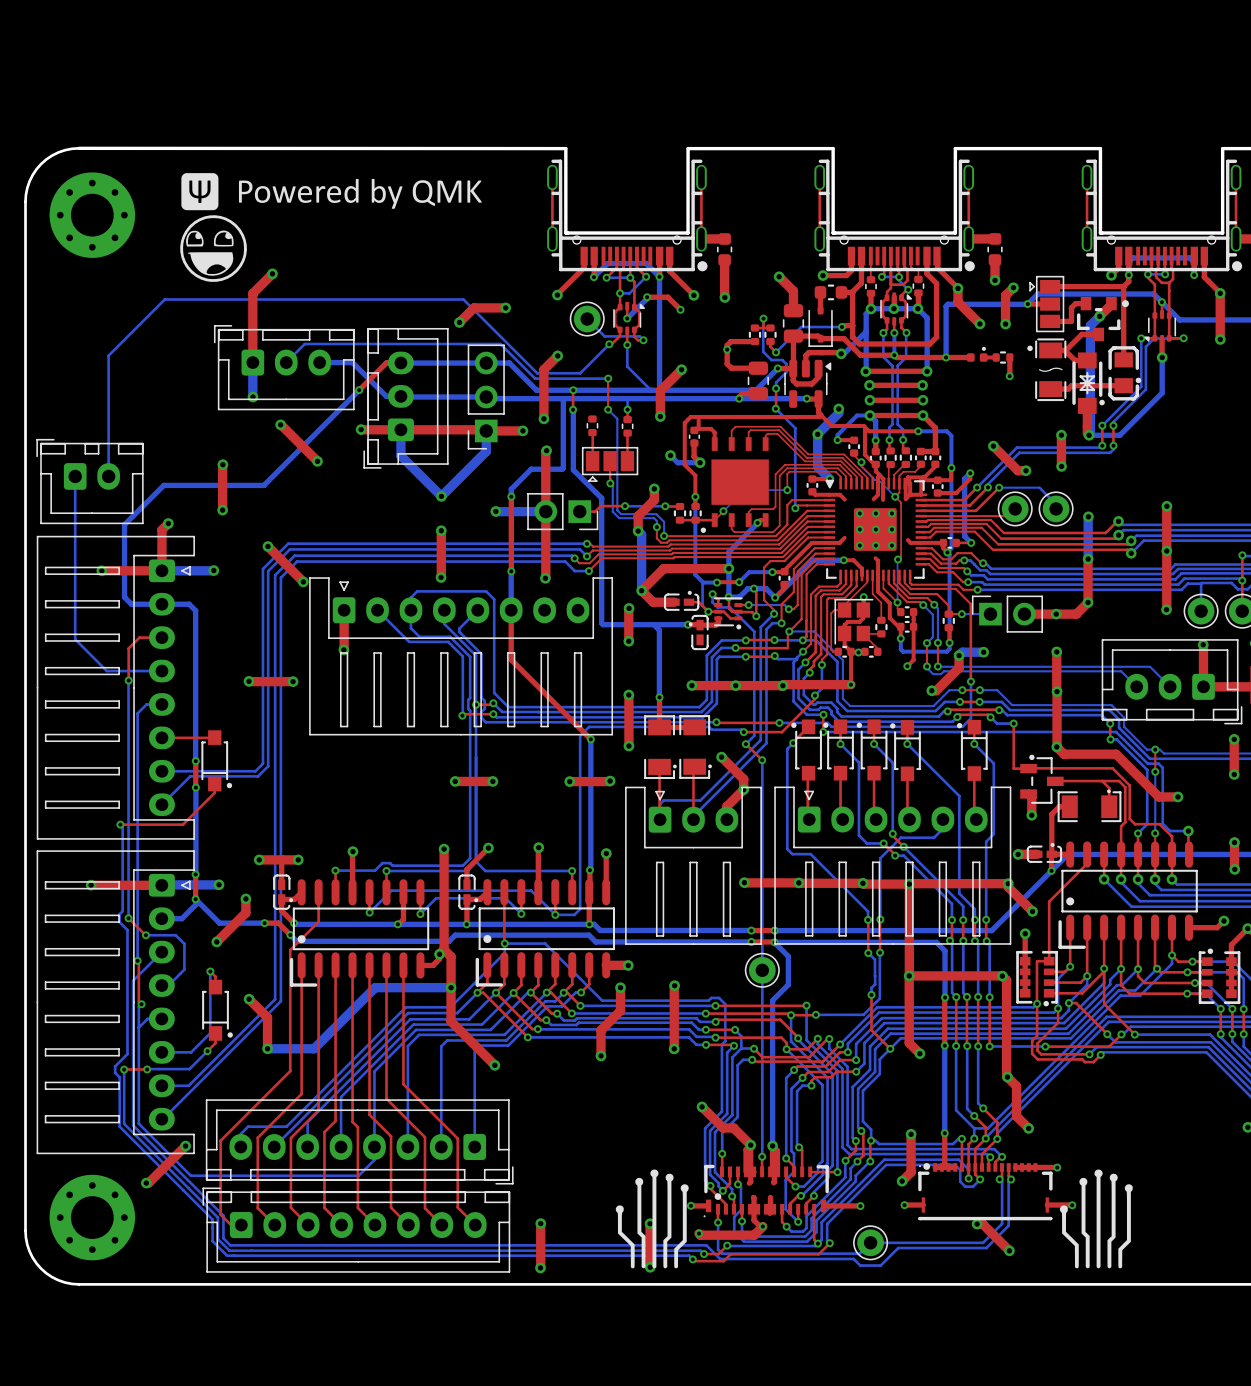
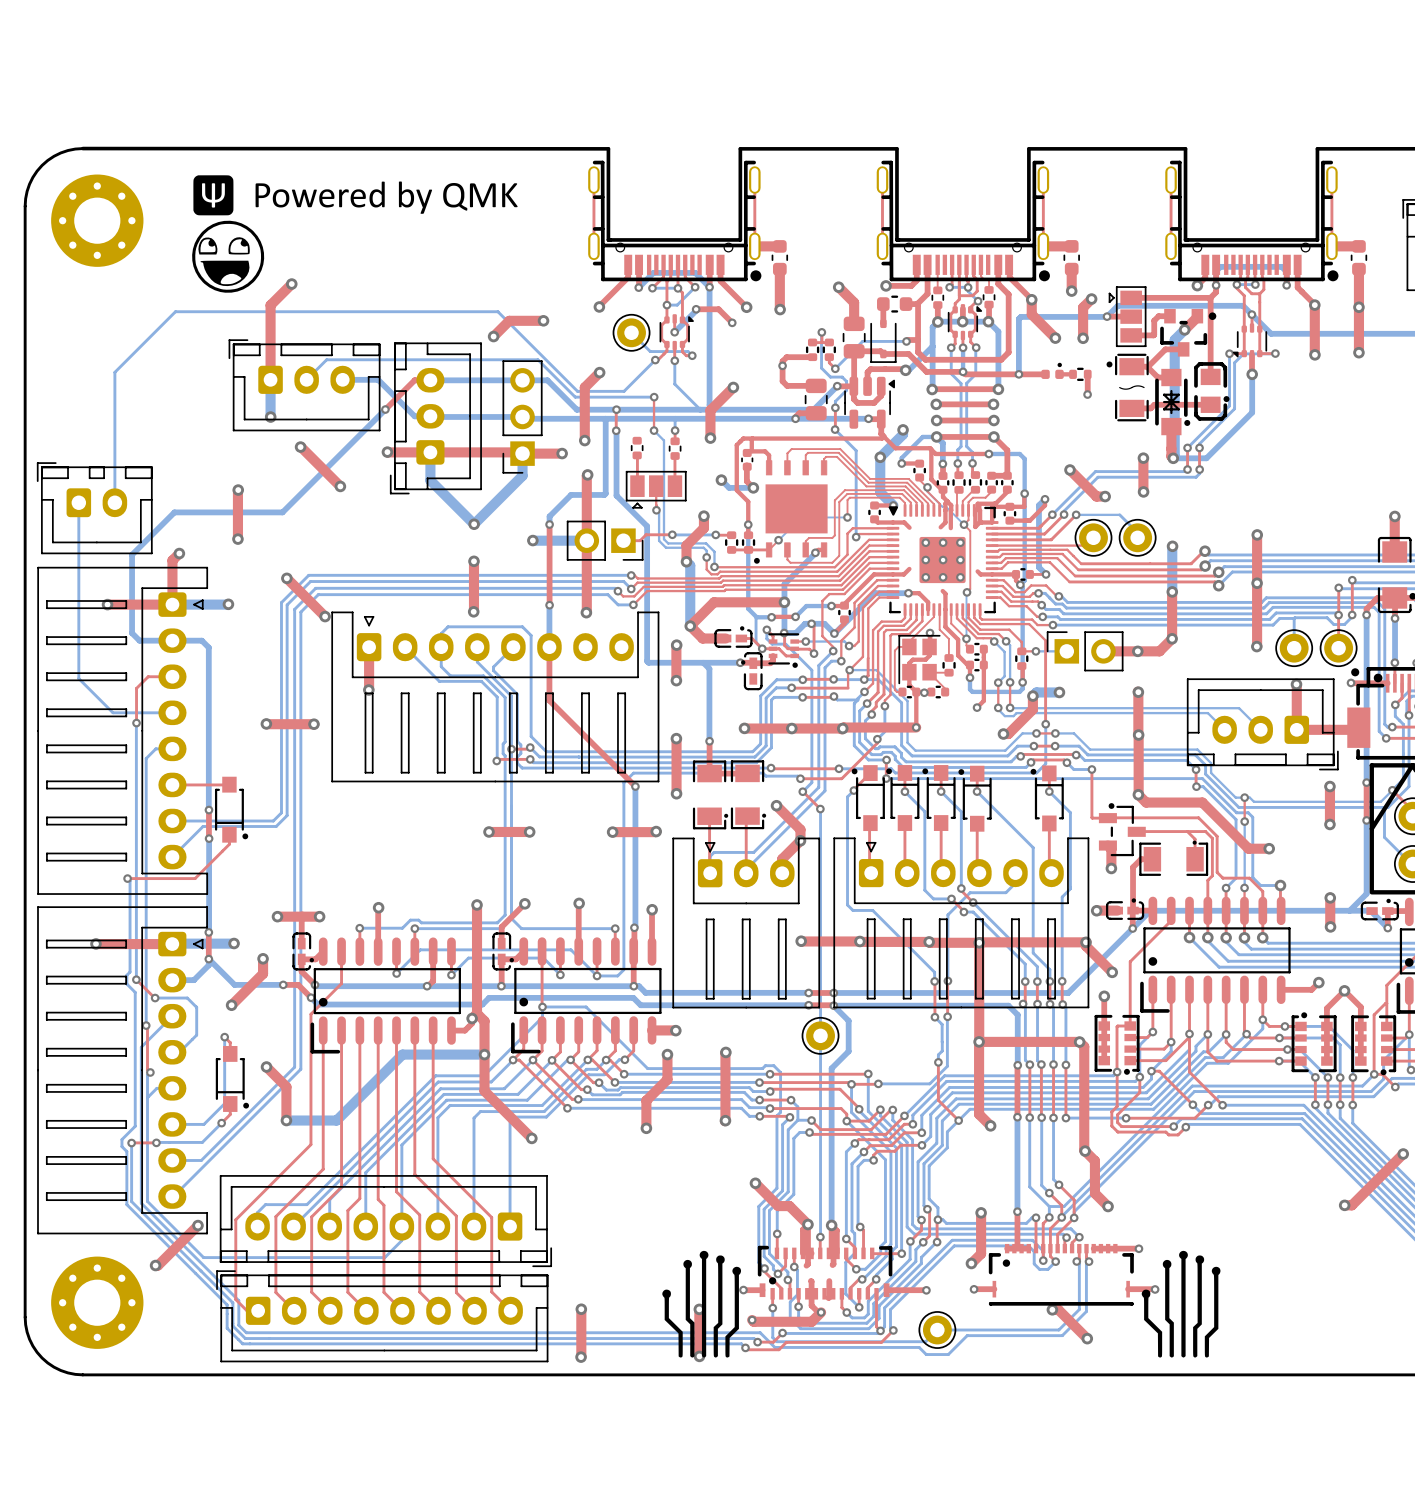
part footprint: [918, 1163, 1053, 1221] -> [988, 1243, 1134, 1306]
part footprint: [703, 1164, 829, 1218] -> [757, 1245, 893, 1300]

